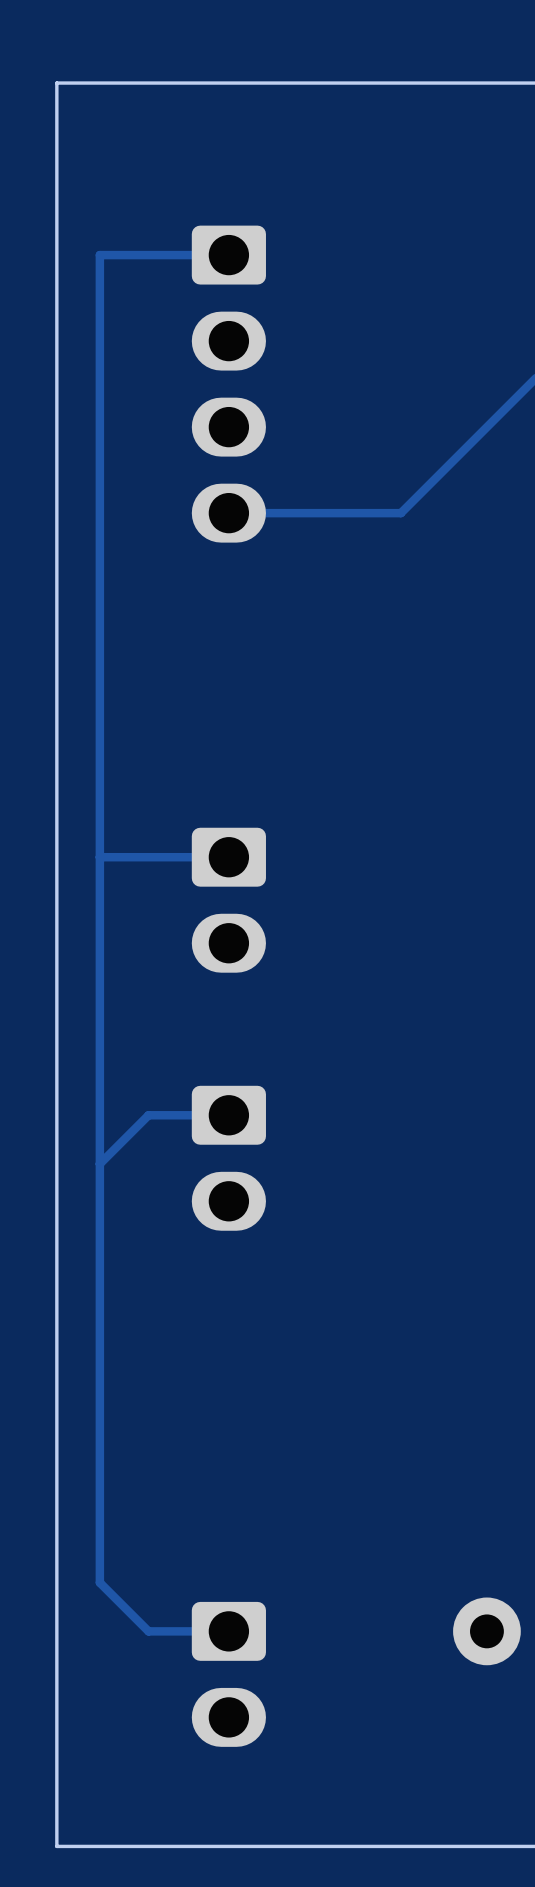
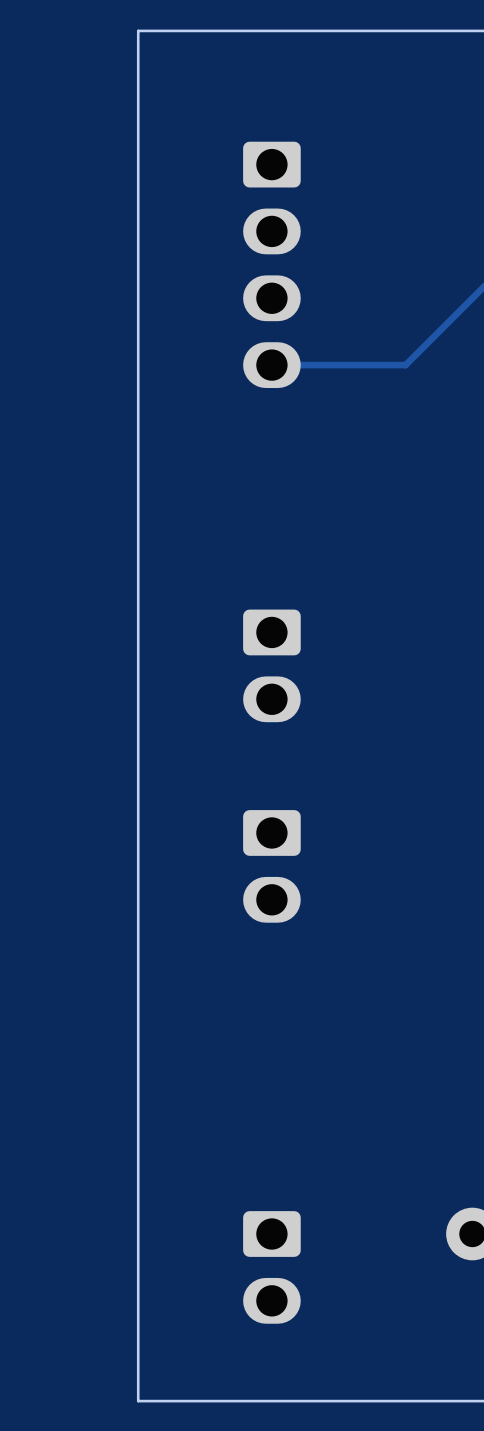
track: (228, 255) (99, 255) (99, 1582) (148, 1631) (228, 1631) -> none
track: (228, 857) (99, 857) -> none
track: (228, 1115) (148, 1115) (99, 1163) -> none

